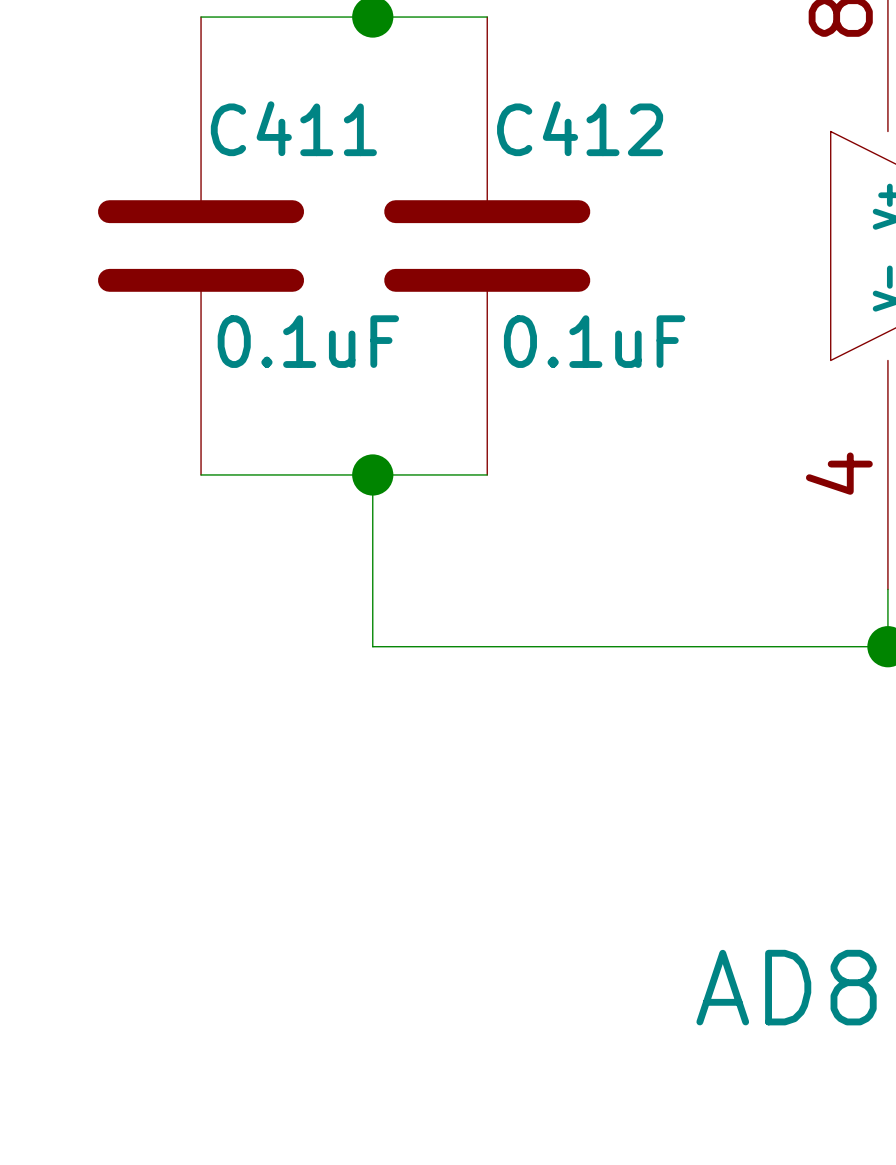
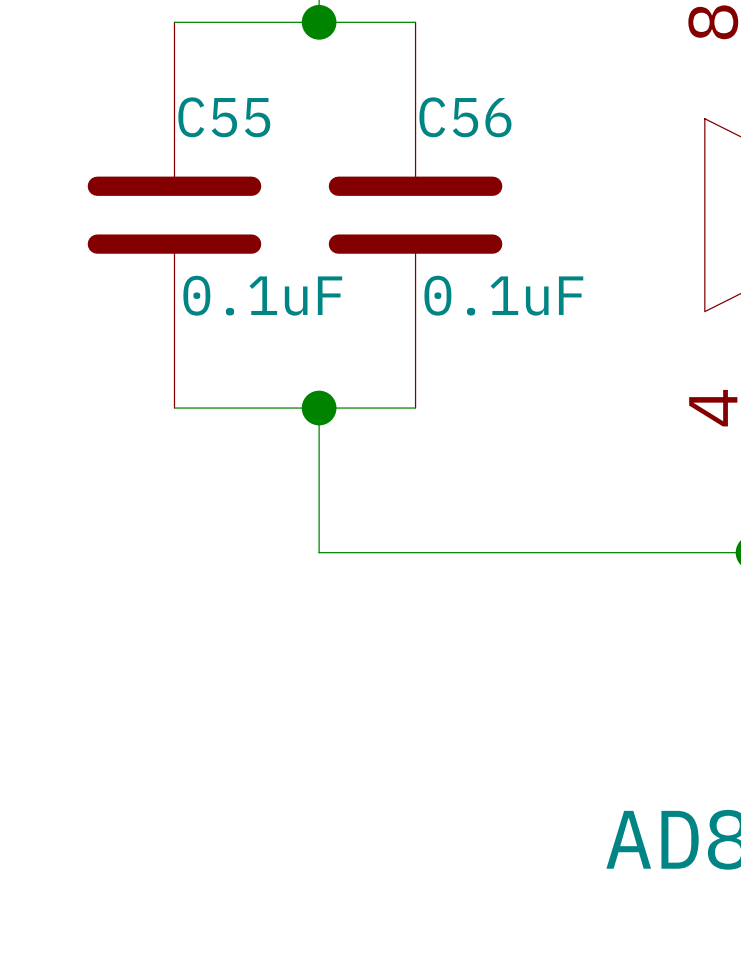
C411 name: C411 (293, 128) -> C55 (224, 117)
C412 name: C412 (580, 128) -> C56 (465, 117)

